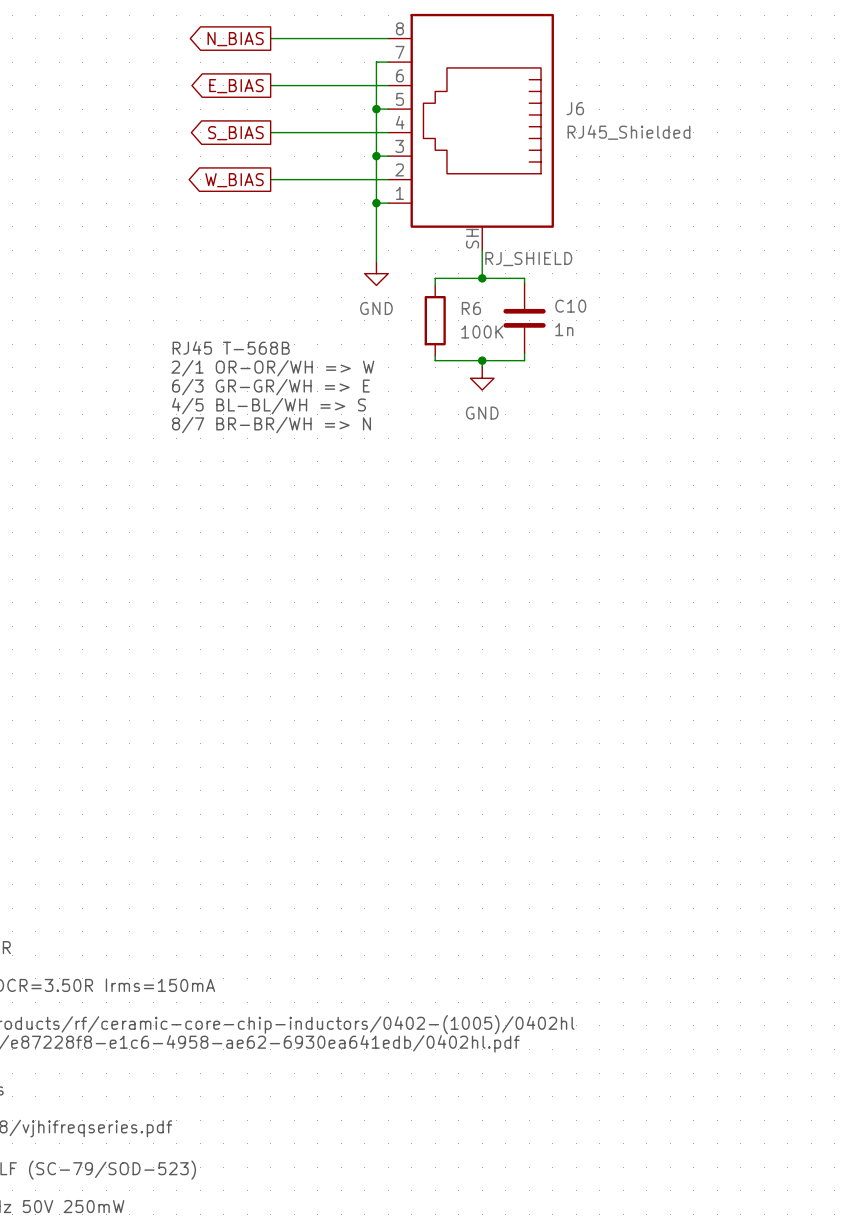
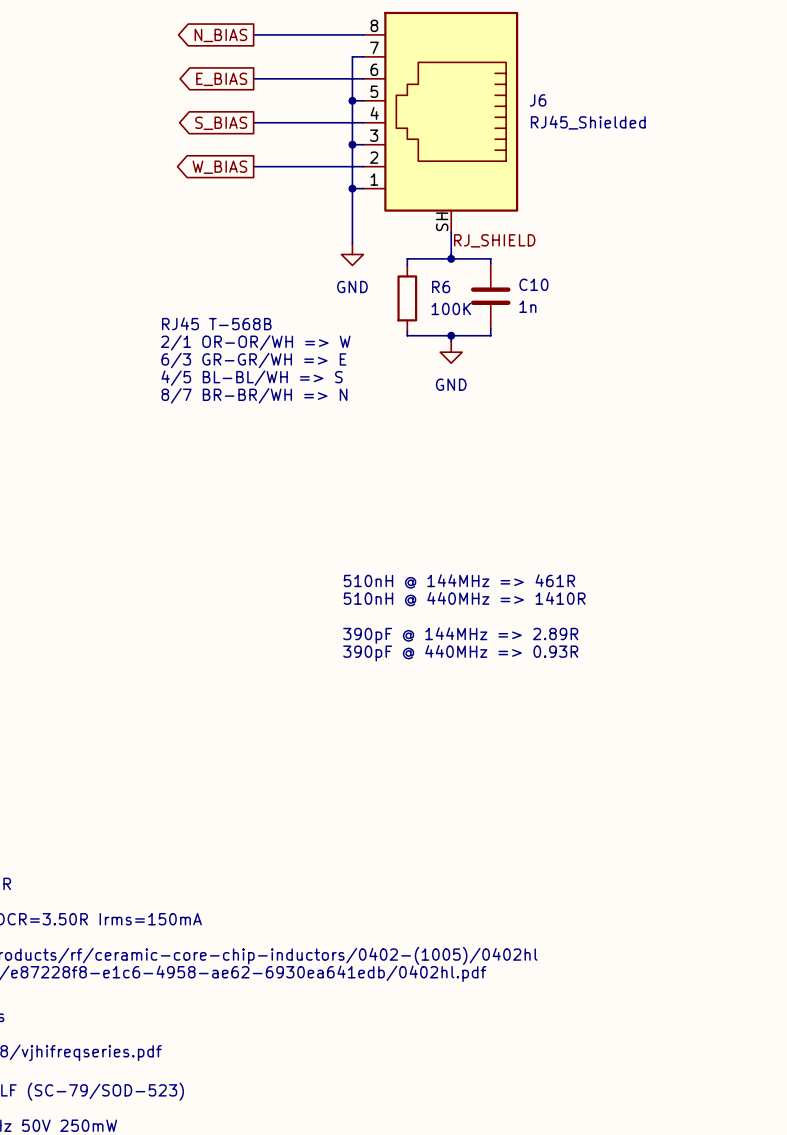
text: none -> 510nH @ 144MHz => 461R (459, 581)
text: none -> 510nH @ 440MHz => 1410R (464, 599)
text: none -> 390pF @ 144MHz => 2.89R (460, 635)
text: none -> 390pF @ 440MHz => 0.93R (460, 653)

